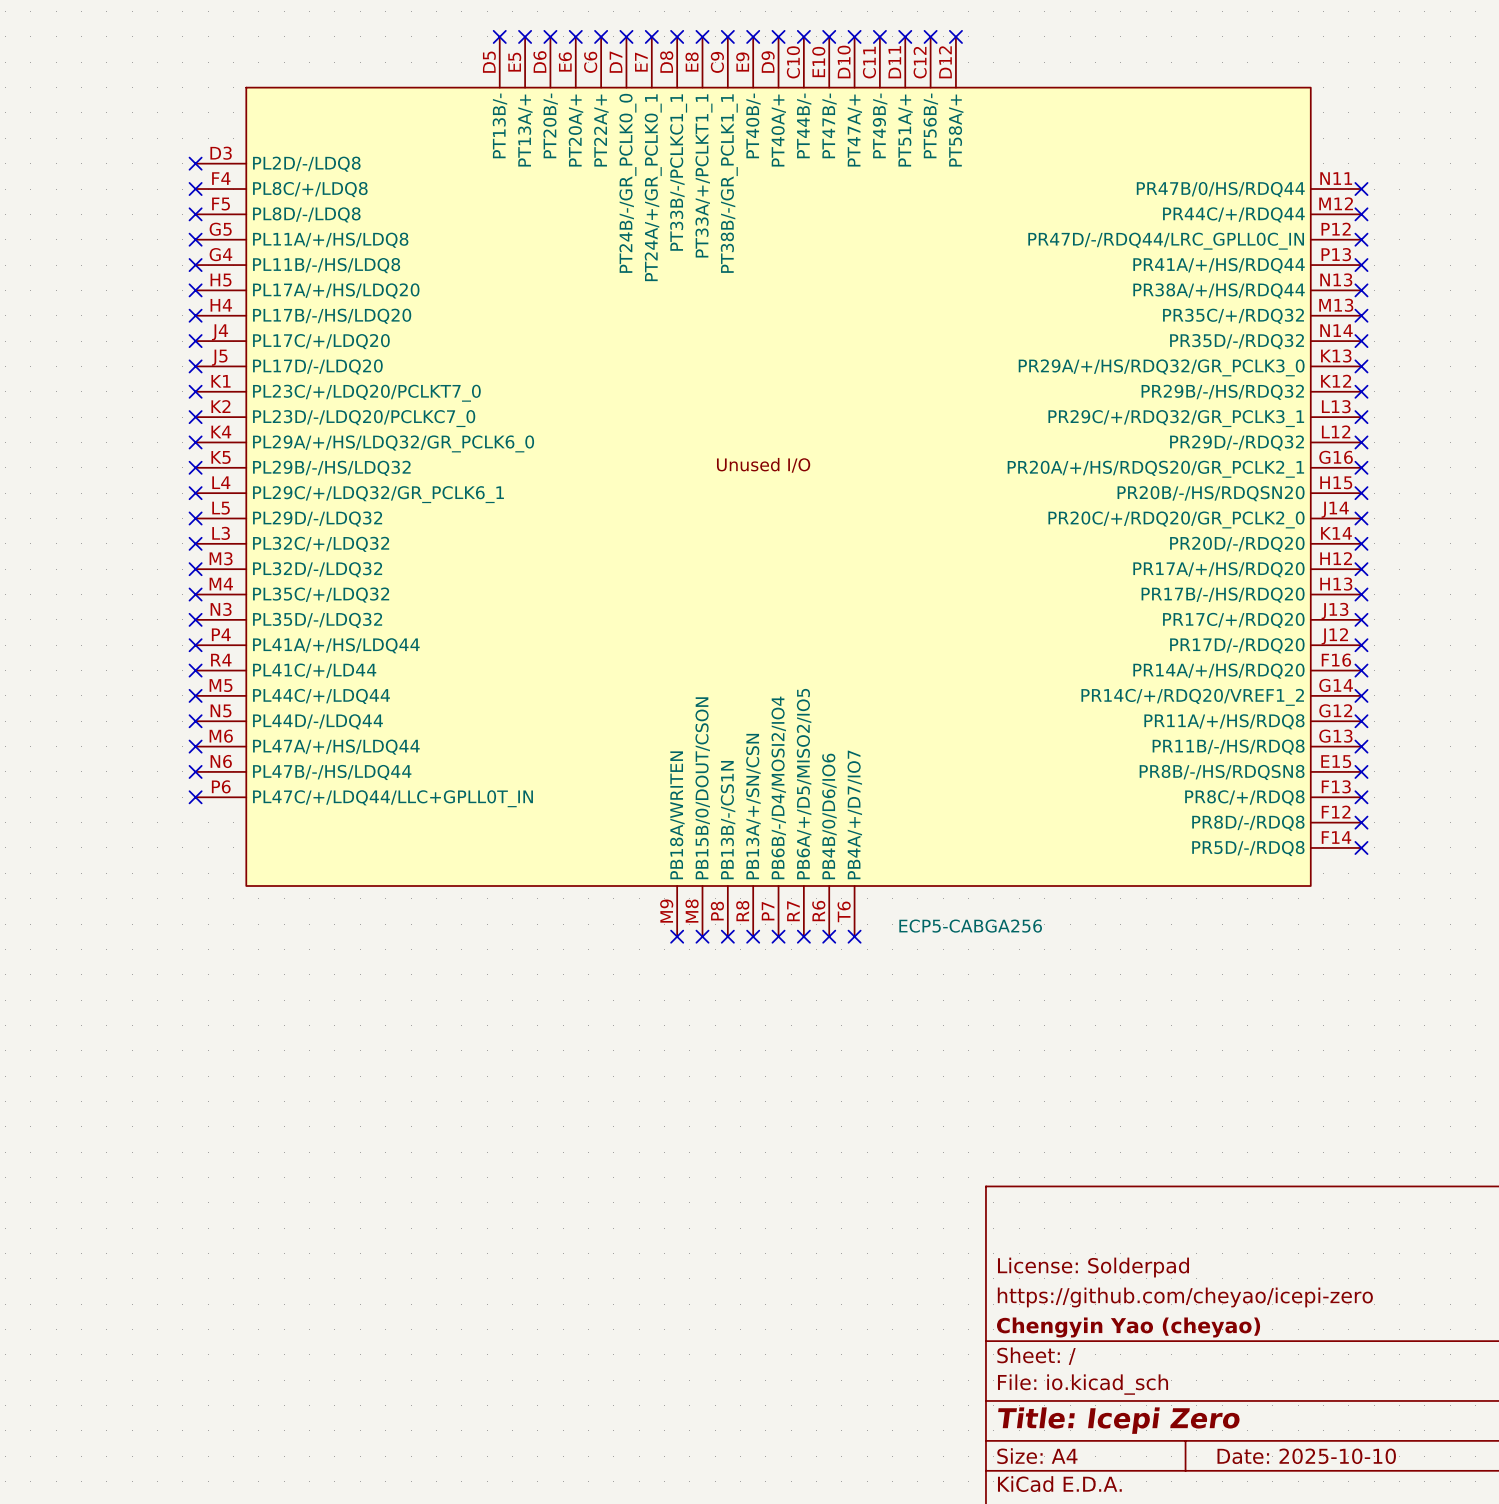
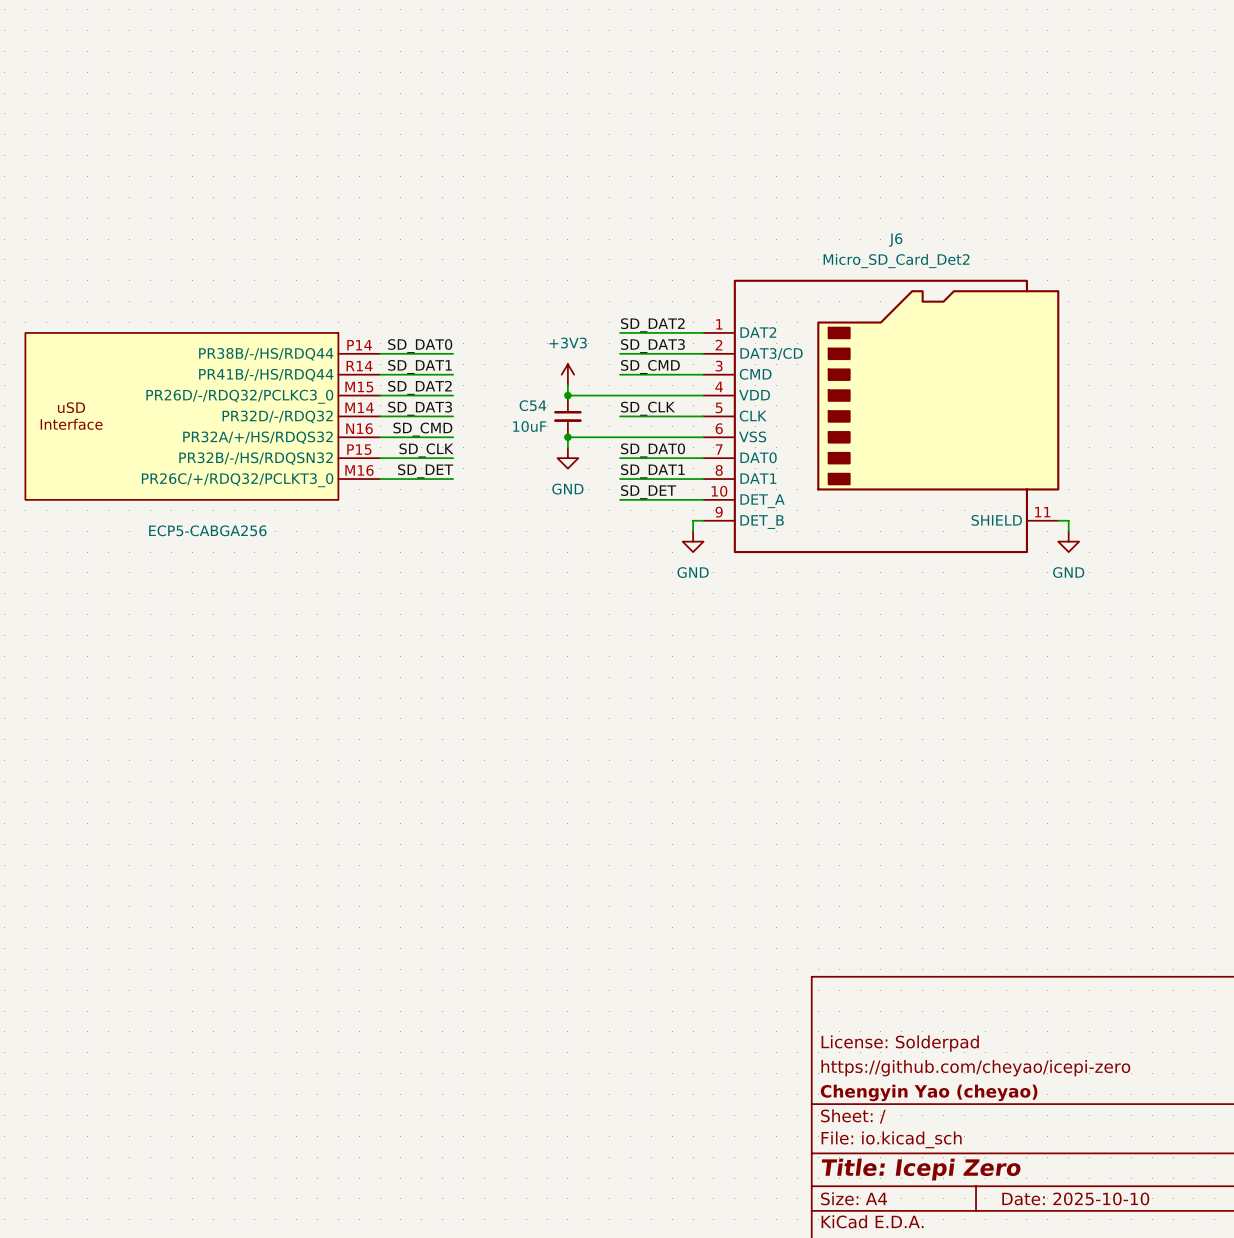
no-connect mark: (499, 36) -> none
no-connect mark: (525, 36) -> none
no-connect mark: (550, 36) -> none
no-connect mark: (575, 36) -> none
no-connect mark: (601, 36) -> none
no-connect mark: (626, 36) -> none
no-connect mark: (651, 36) -> none
no-connect mark: (677, 36) -> none
no-connect mark: (702, 36) -> none
no-connect mark: (727, 36) -> none
no-connect mark: (753, 36) -> none
no-connect mark: (778, 36) -> none
no-connect mark: (803, 36) -> none
no-connect mark: (829, 36) -> none
no-connect mark: (854, 36) -> none
no-connect mark: (879, 36) -> none
no-connect mark: (905, 36) -> none
no-connect mark: (930, 36) -> none
no-connect mark: (955, 36) -> none
no-connect mark: (195, 163) -> none
no-connect mark: (195, 189) -> none
no-connect mark: (1361, 189) -> none
no-connect mark: (195, 214) -> none
no-connect mark: (1361, 214) -> none
no-connect mark: (195, 239) -> none
no-connect mark: (1361, 239) -> none
no-connect mark: (195, 265) -> none
no-connect mark: (1361, 265) -> none
no-connect mark: (195, 290) -> none
no-connect mark: (1361, 290) -> none
no-connect mark: (195, 315) -> none
no-connect mark: (1361, 315) -> none
no-connect mark: (195, 341) -> none
no-connect mark: (1361, 341) -> none
no-connect mark: (195, 366) -> none
no-connect mark: (1361, 366) -> none
no-connect mark: (195, 391) -> none
no-connect mark: (1361, 391) -> none
label: none -> SD_DAT2 (652, 325)
no-connect mark: (195, 417) -> none
no-connect mark: (1361, 417) -> none
label: none -> SD_DAT0 (420, 346)
label: none -> SD_DAT3 (652, 346)
no-connect mark: (195, 442) -> none
no-connect mark: (1361, 442) -> none
label: none -> SD_DAT1 (420, 366)
label: none -> SD_CMD (650, 366)
power symbol: none -> +3V3 (567, 374)
no-connect mark: (195, 467) -> none
no-connect mark: (1361, 467) -> none
label: none -> SD_DAT2 (419, 387)
junction: none -> (567, 395)
part: ECP5-CABGA256 (778, 486) -> none
no-connect mark: (195, 493) -> none
no-connect mark: (1361, 493) -> none
label: none -> SD_DAT3 (420, 408)
label: none -> SD_CLK (648, 408)
part: none -> ECP5-CABGA256 (202, 416)
C54: none -> 10uF (567, 416)
J6: none -> Micro_SD_Card_Det2 (881, 416)
no-connect mark: (195, 518) -> none
no-connect mark: (1361, 518) -> none
label: none -> SD_CMD (422, 429)
junction: none -> (567, 437)
no-connect mark: (195, 543) -> none
no-connect mark: (1361, 543) -> none
label: none -> SD_CLK (426, 450)
label: none -> SD_DAT0 (653, 450)
power symbol: none -> GND (567, 458)
no-connect mark: (195, 569) -> none
no-connect mark: (1361, 569) -> none
label: none -> SD_DET (425, 471)
label: none -> SD_DAT1 (652, 471)
no-connect mark: (195, 594) -> none
no-connect mark: (1361, 594) -> none
label: none -> SD_DET (648, 492)
no-connect mark: (195, 619) -> none
no-connect mark: (1361, 619) -> none
no-connect mark: (195, 645) -> none
no-connect mark: (1361, 645) -> none
power symbol: none -> GND (693, 541)
power symbol: none -> GND (1068, 541)
no-connect mark: (195, 670) -> none
no-connect mark: (1361, 670) -> none
no-connect mark: (195, 695) -> none
no-connect mark: (1361, 695) -> none
no-connect mark: (195, 721) -> none
no-connect mark: (1361, 721) -> none
no-connect mark: (195, 746) -> none
no-connect mark: (1361, 746) -> none
no-connect mark: (195, 771) -> none
no-connect mark: (1361, 771) -> none
no-connect mark: (195, 797) -> none
no-connect mark: (1361, 797) -> none
no-connect mark: (1361, 822) -> none
no-connect mark: (1361, 847) -> none
no-connect mark: (677, 936) -> none
no-connect mark: (702, 936) -> none
no-connect mark: (727, 936) -> none
no-connect mark: (753, 936) -> none
no-connect mark: (778, 936) -> none
no-connect mark: (803, 936) -> none
no-connect mark: (829, 936) -> none
no-connect mark: (854, 936) -> none

